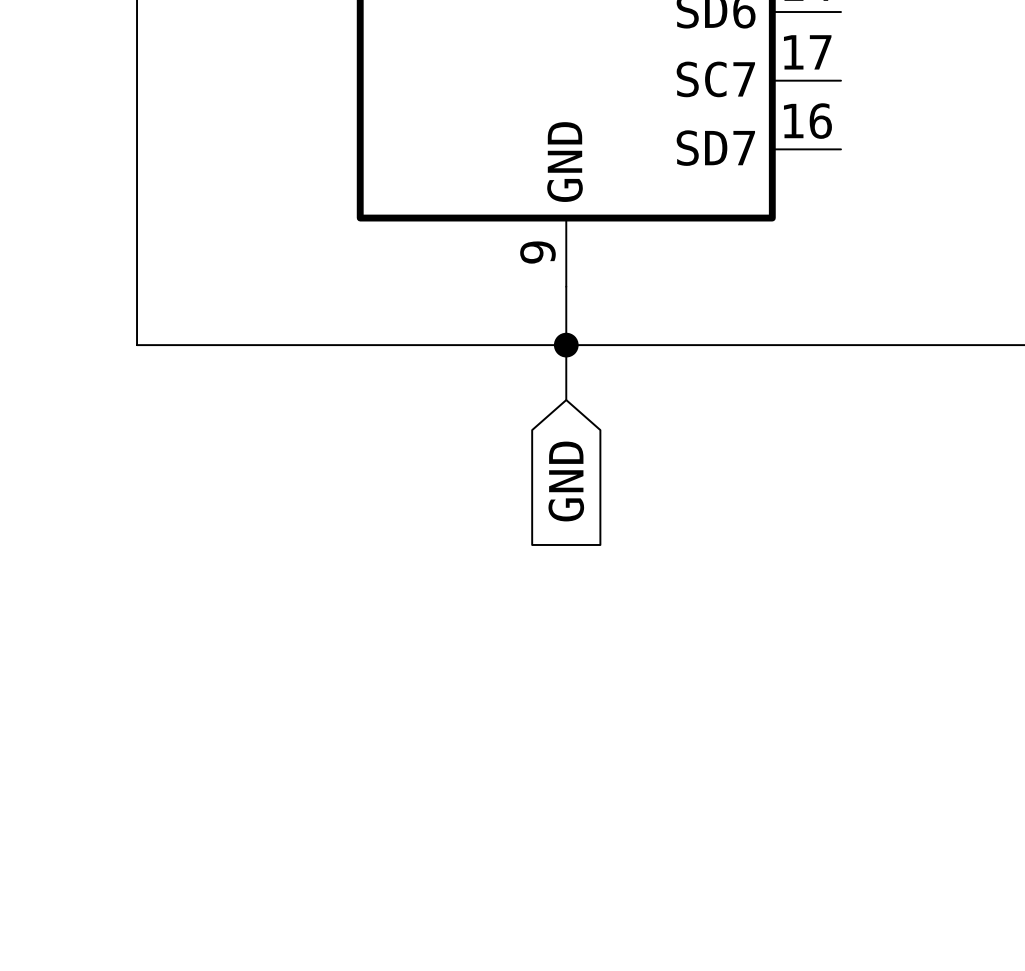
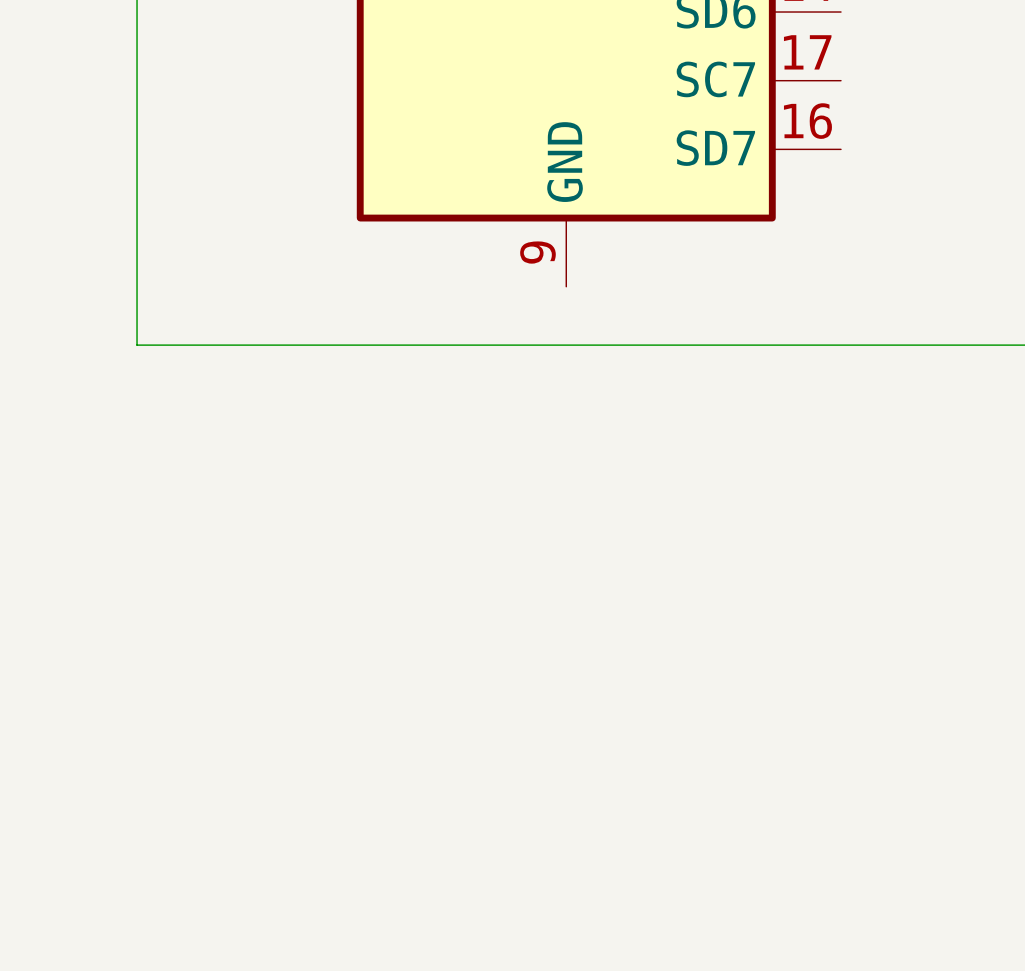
wire: (566, 286) (566, 400) -> none
junction: (566, 345) -> none
global label: GND (566, 481) -> none

